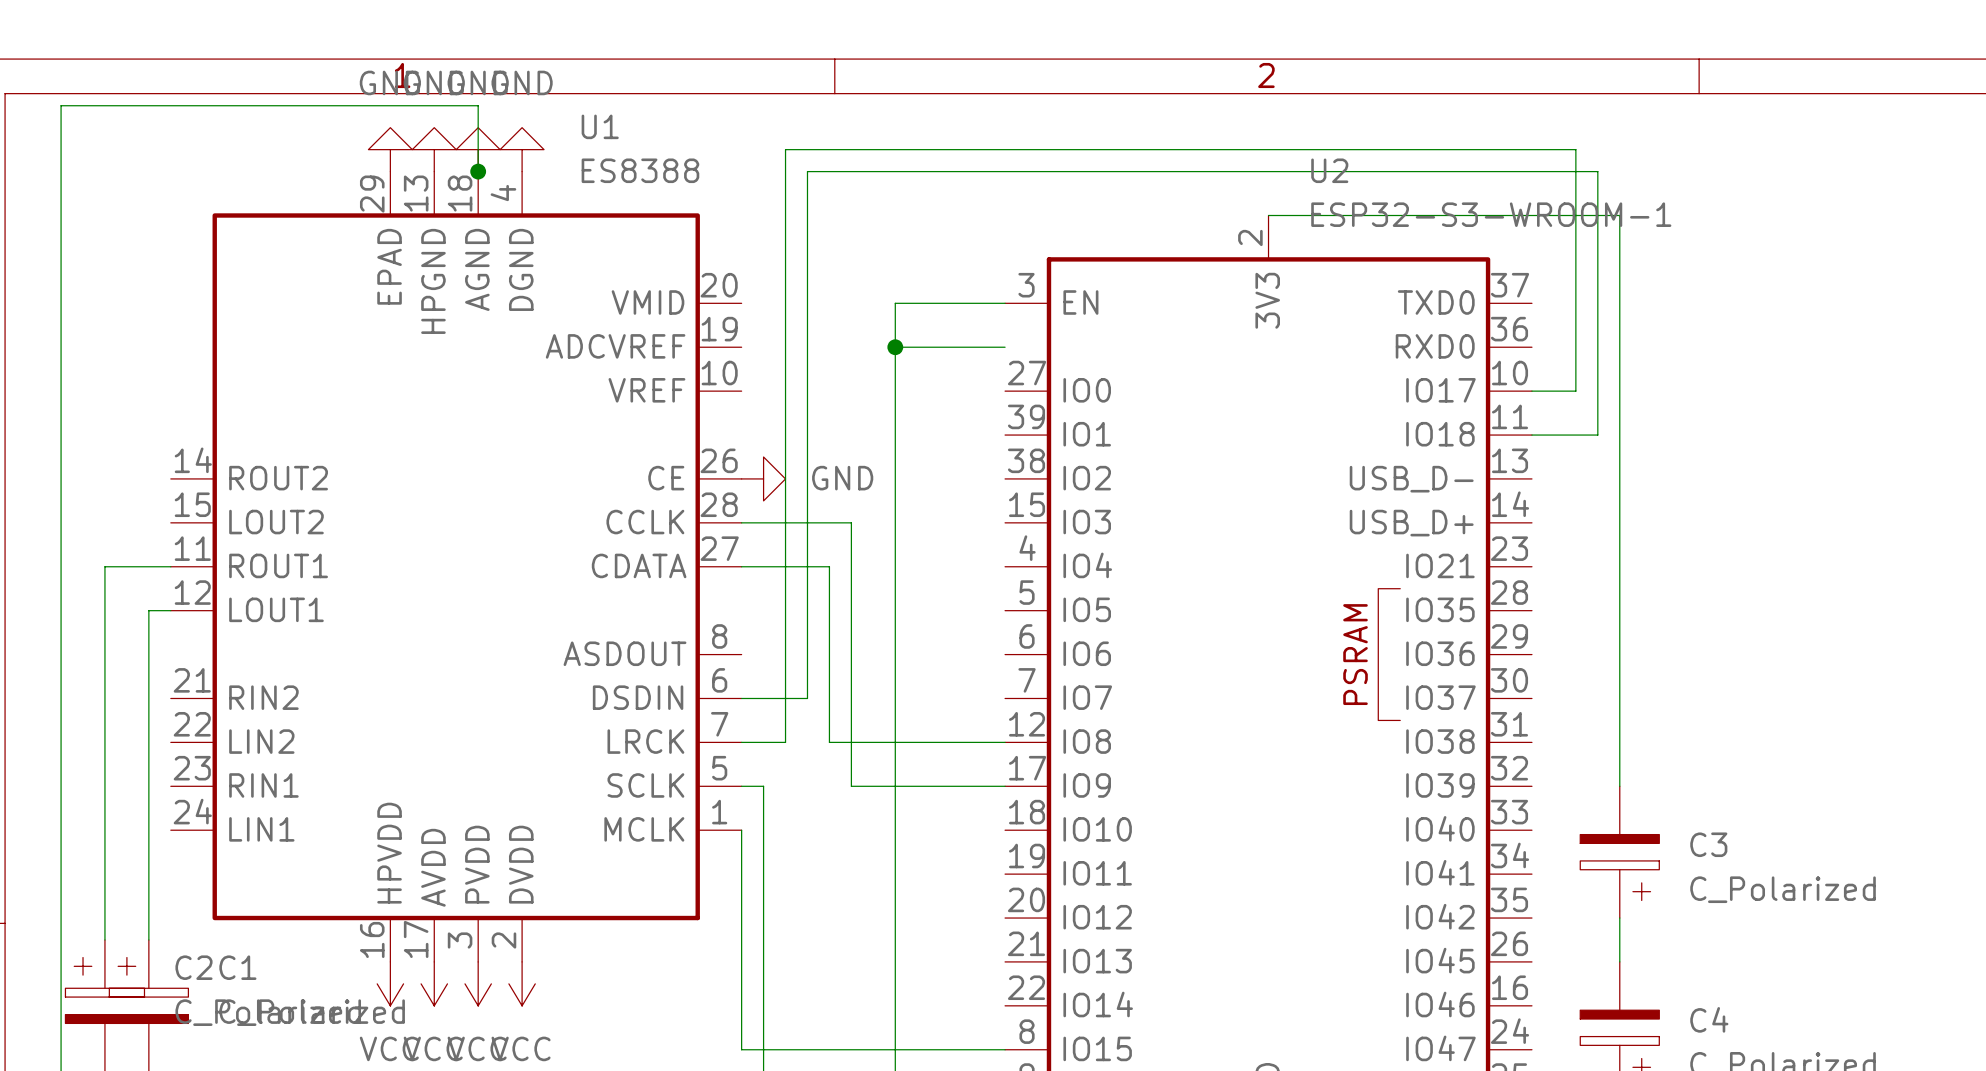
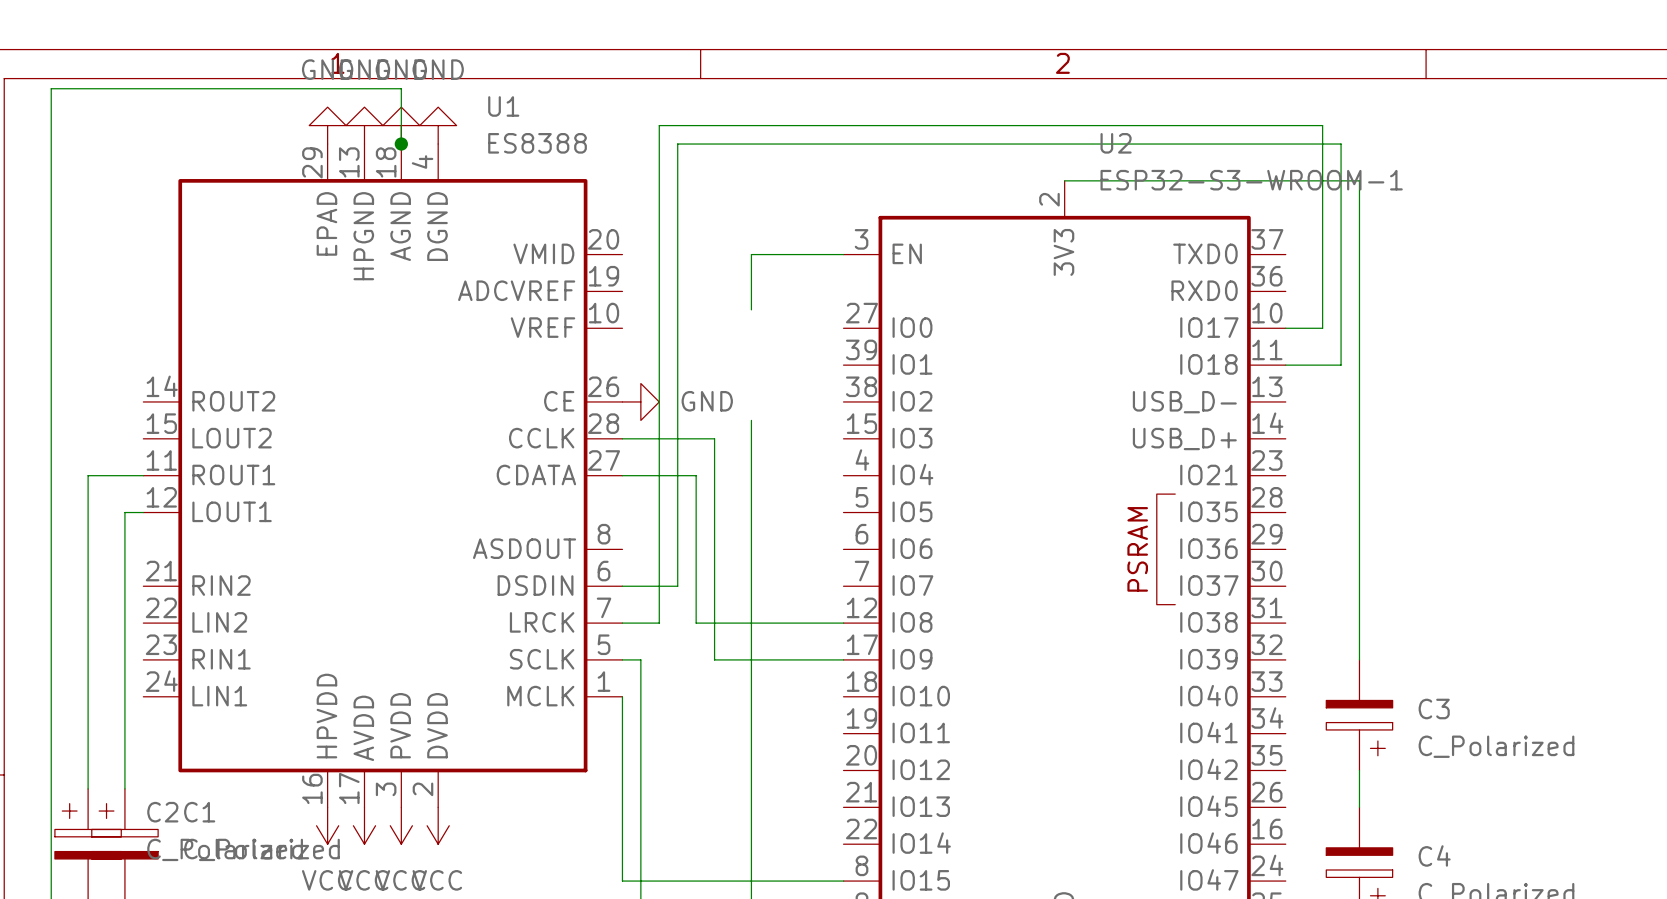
wire: (895, 347) (1005, 347) -> none
junction: (895, 347) -> none
wire: (895, 369) (895, 500) -> none

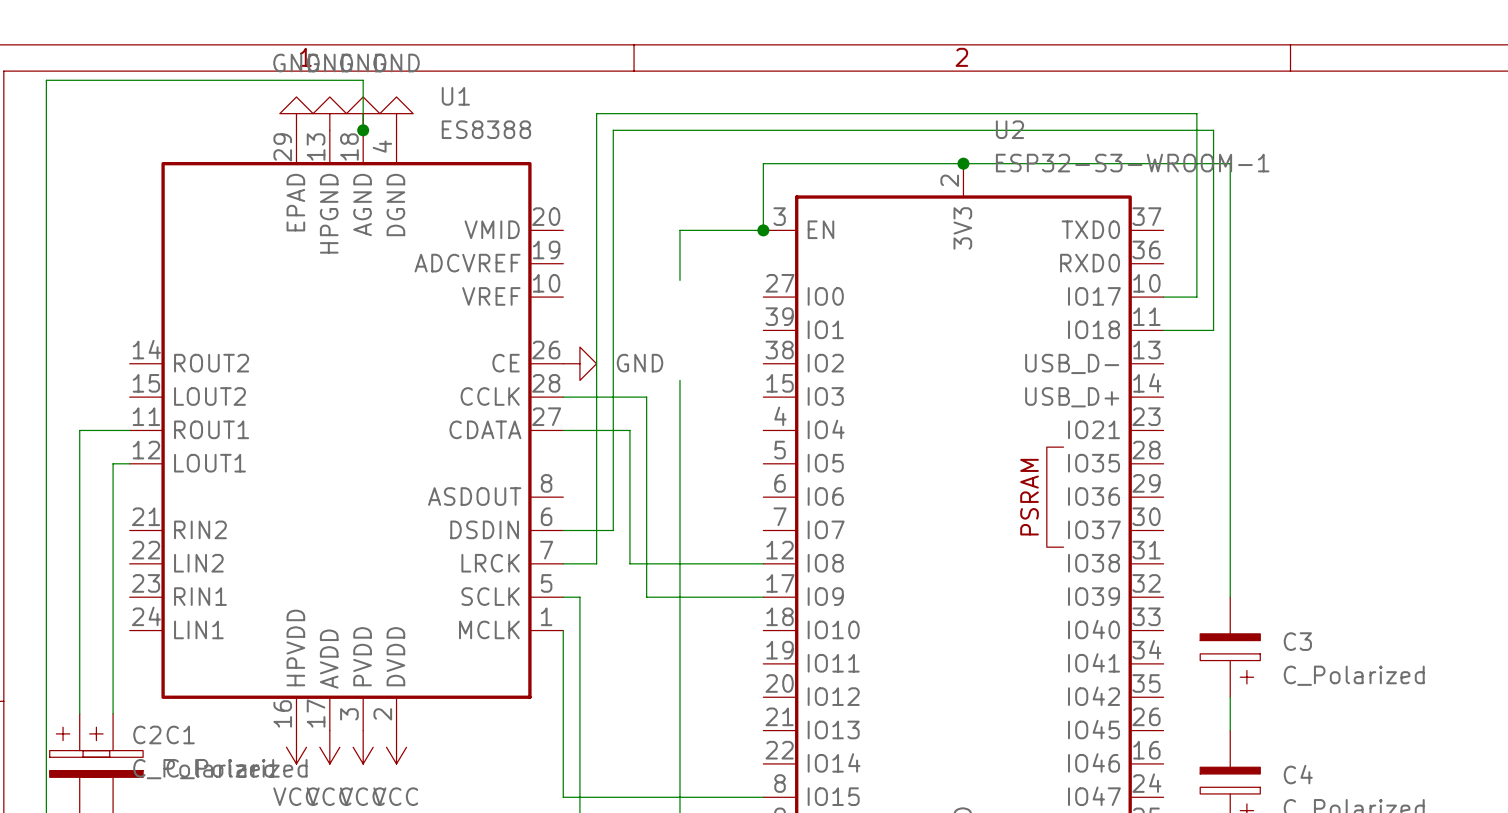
wire: none -> (963, 163) (763, 163) (763, 230)
junction: none -> (963, 163)
junction: none -> (763, 230)

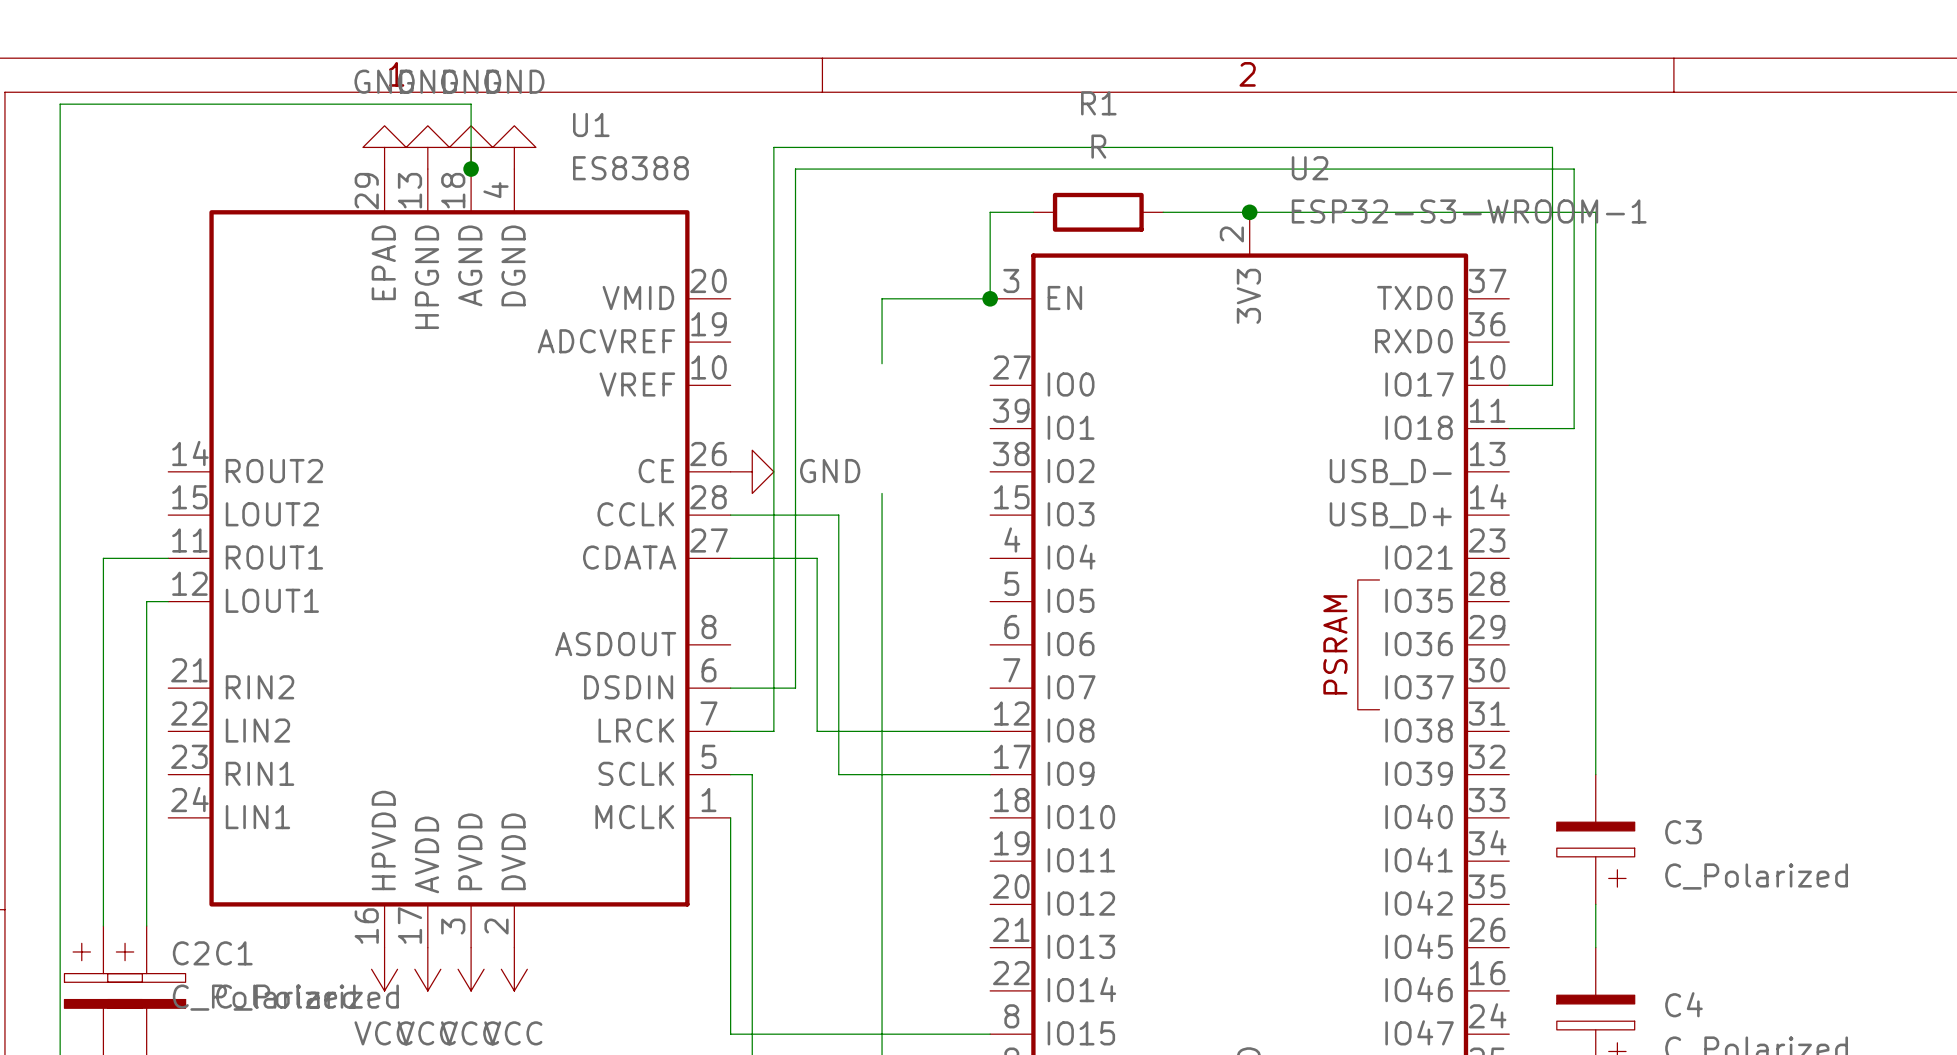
wire: (796, 163) (896, 163) -> none
R1: none -> R (1098, 212)

